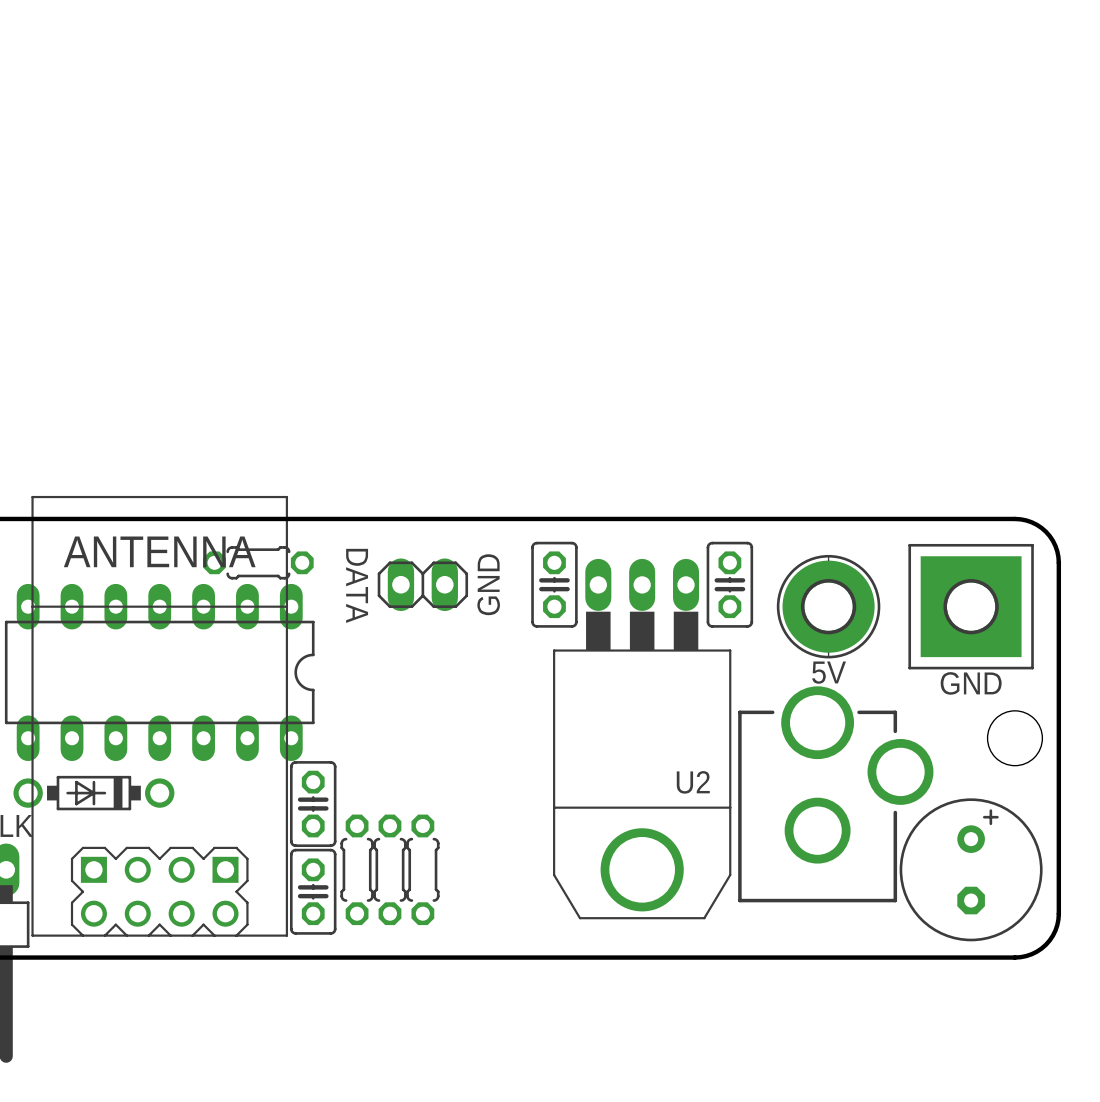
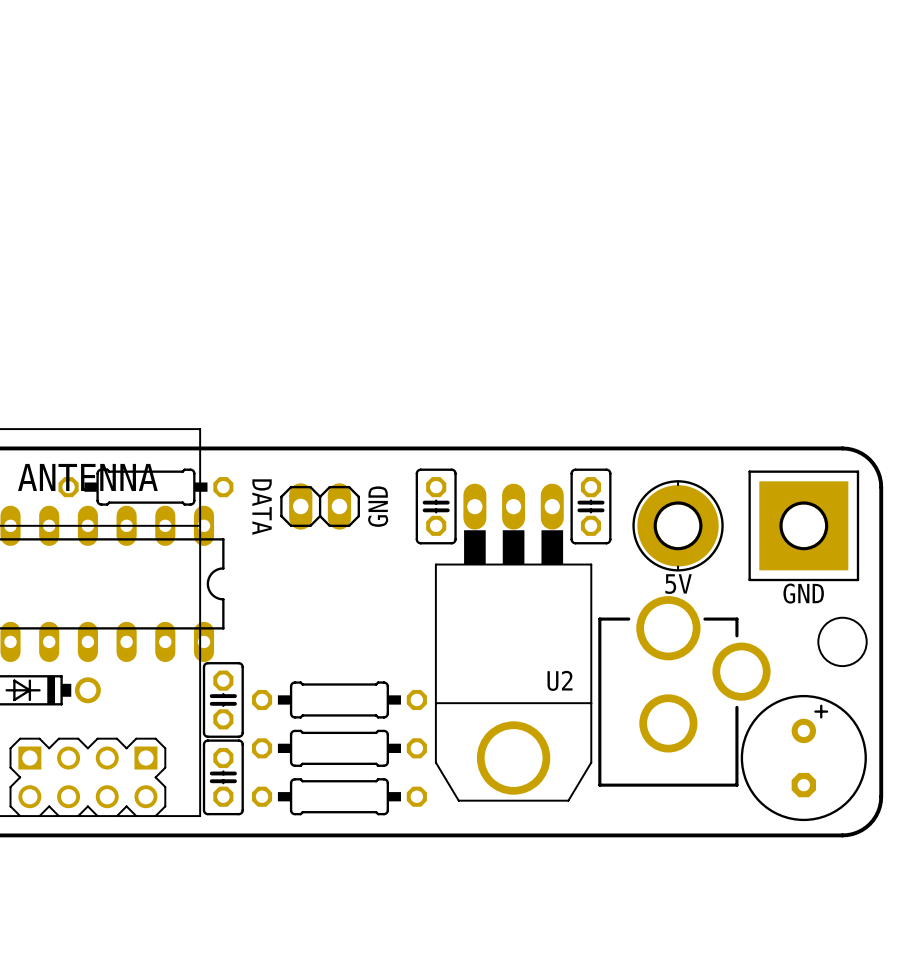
part: none -> (145, 487)
part: (258, 562) -> none
part: none -> (339, 699)
part: none -> (339, 748)
part: (357, 869) -> none
part: (389, 869) -> none
part: (422, 869) -> none
part: none -> (339, 796)

